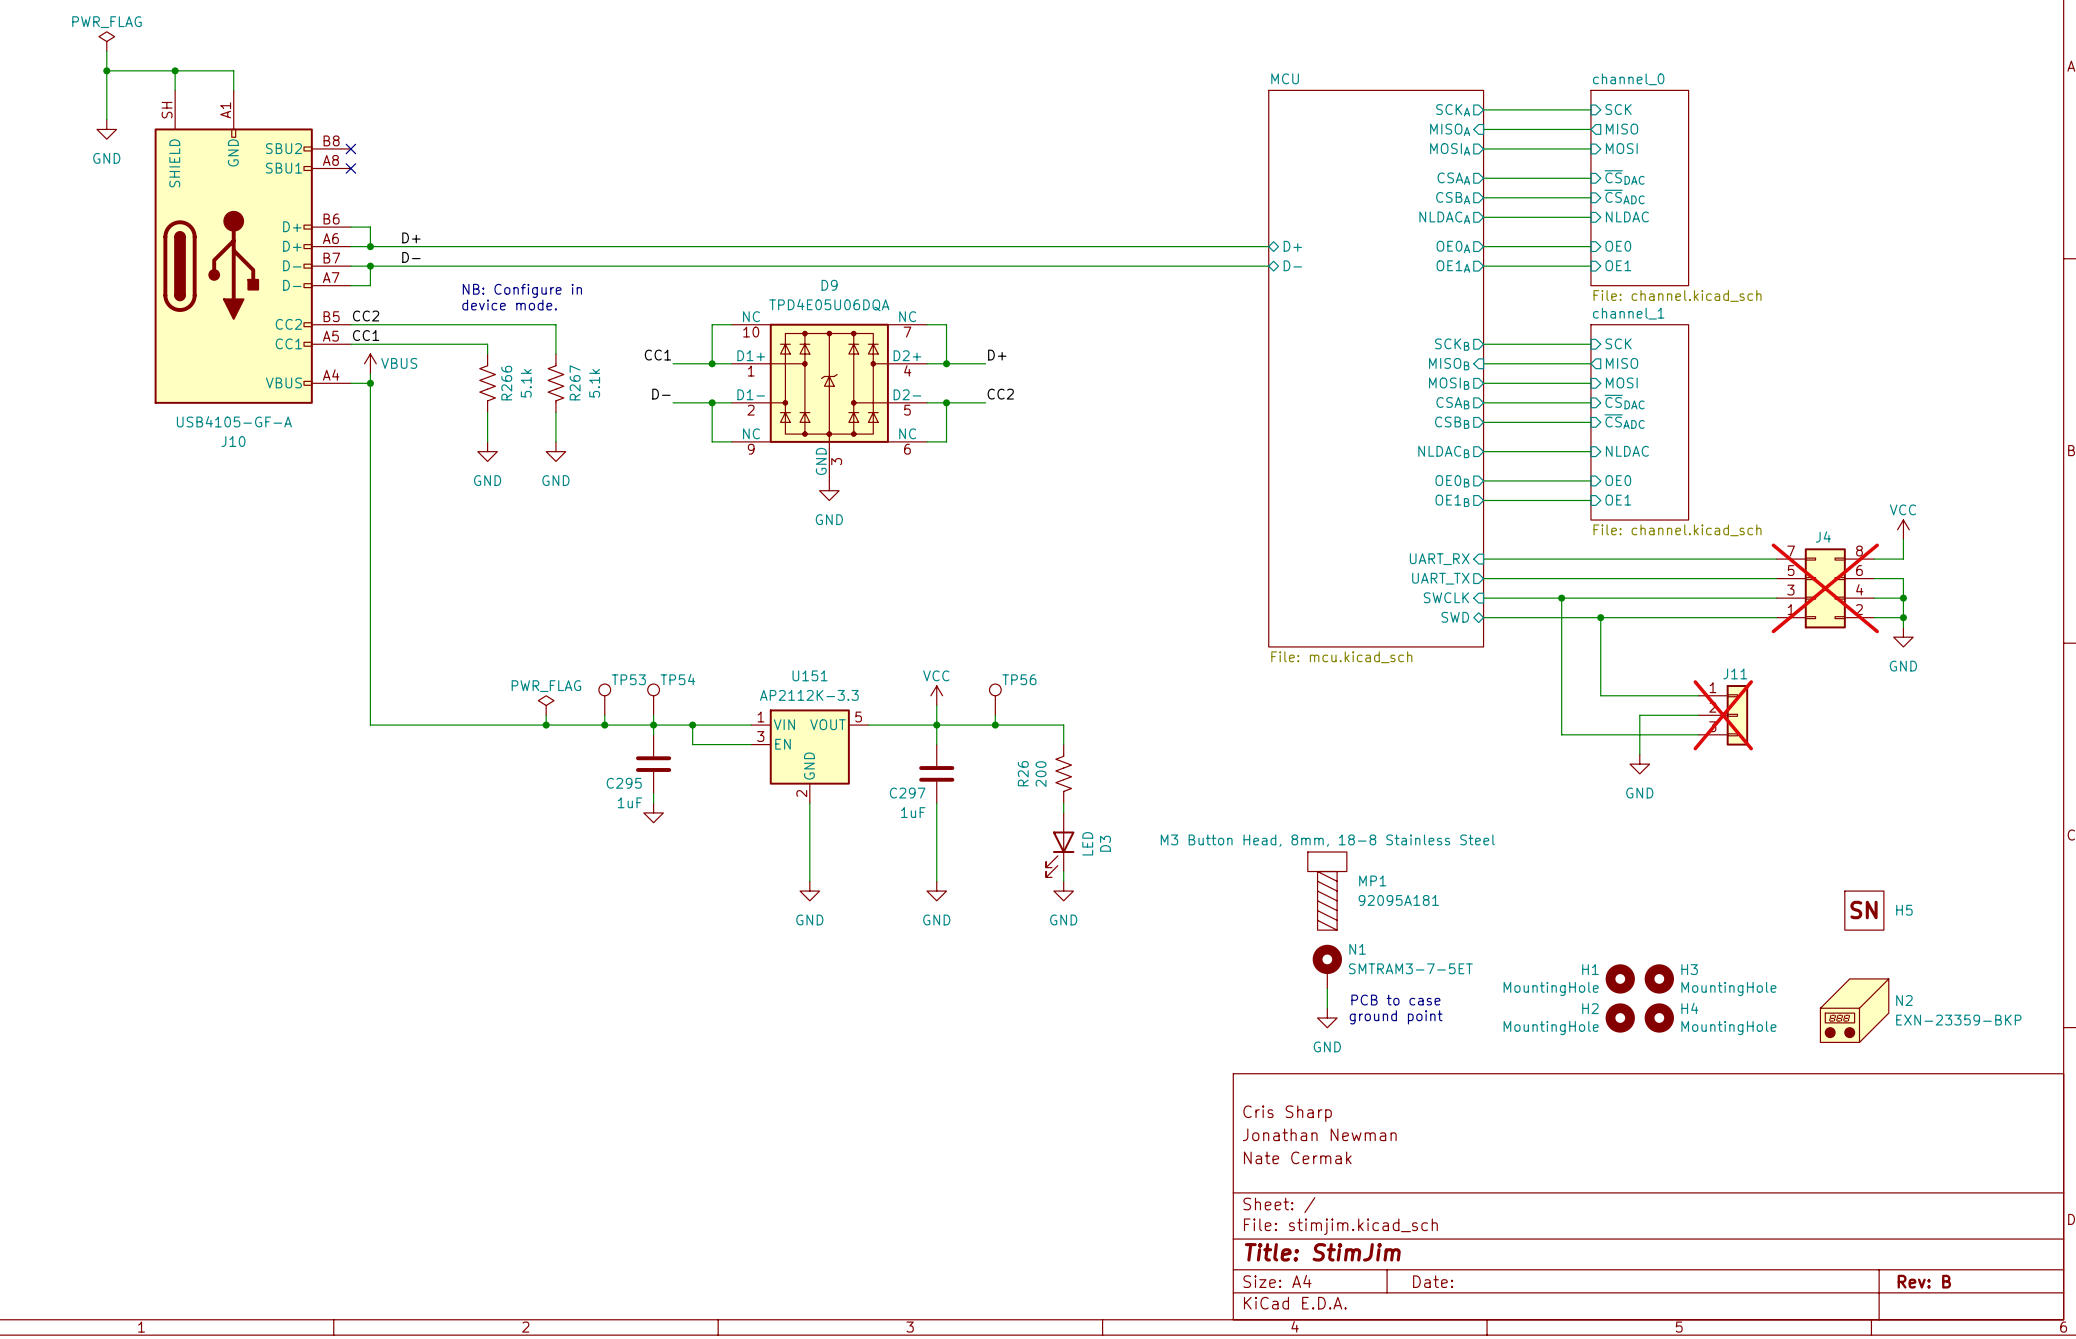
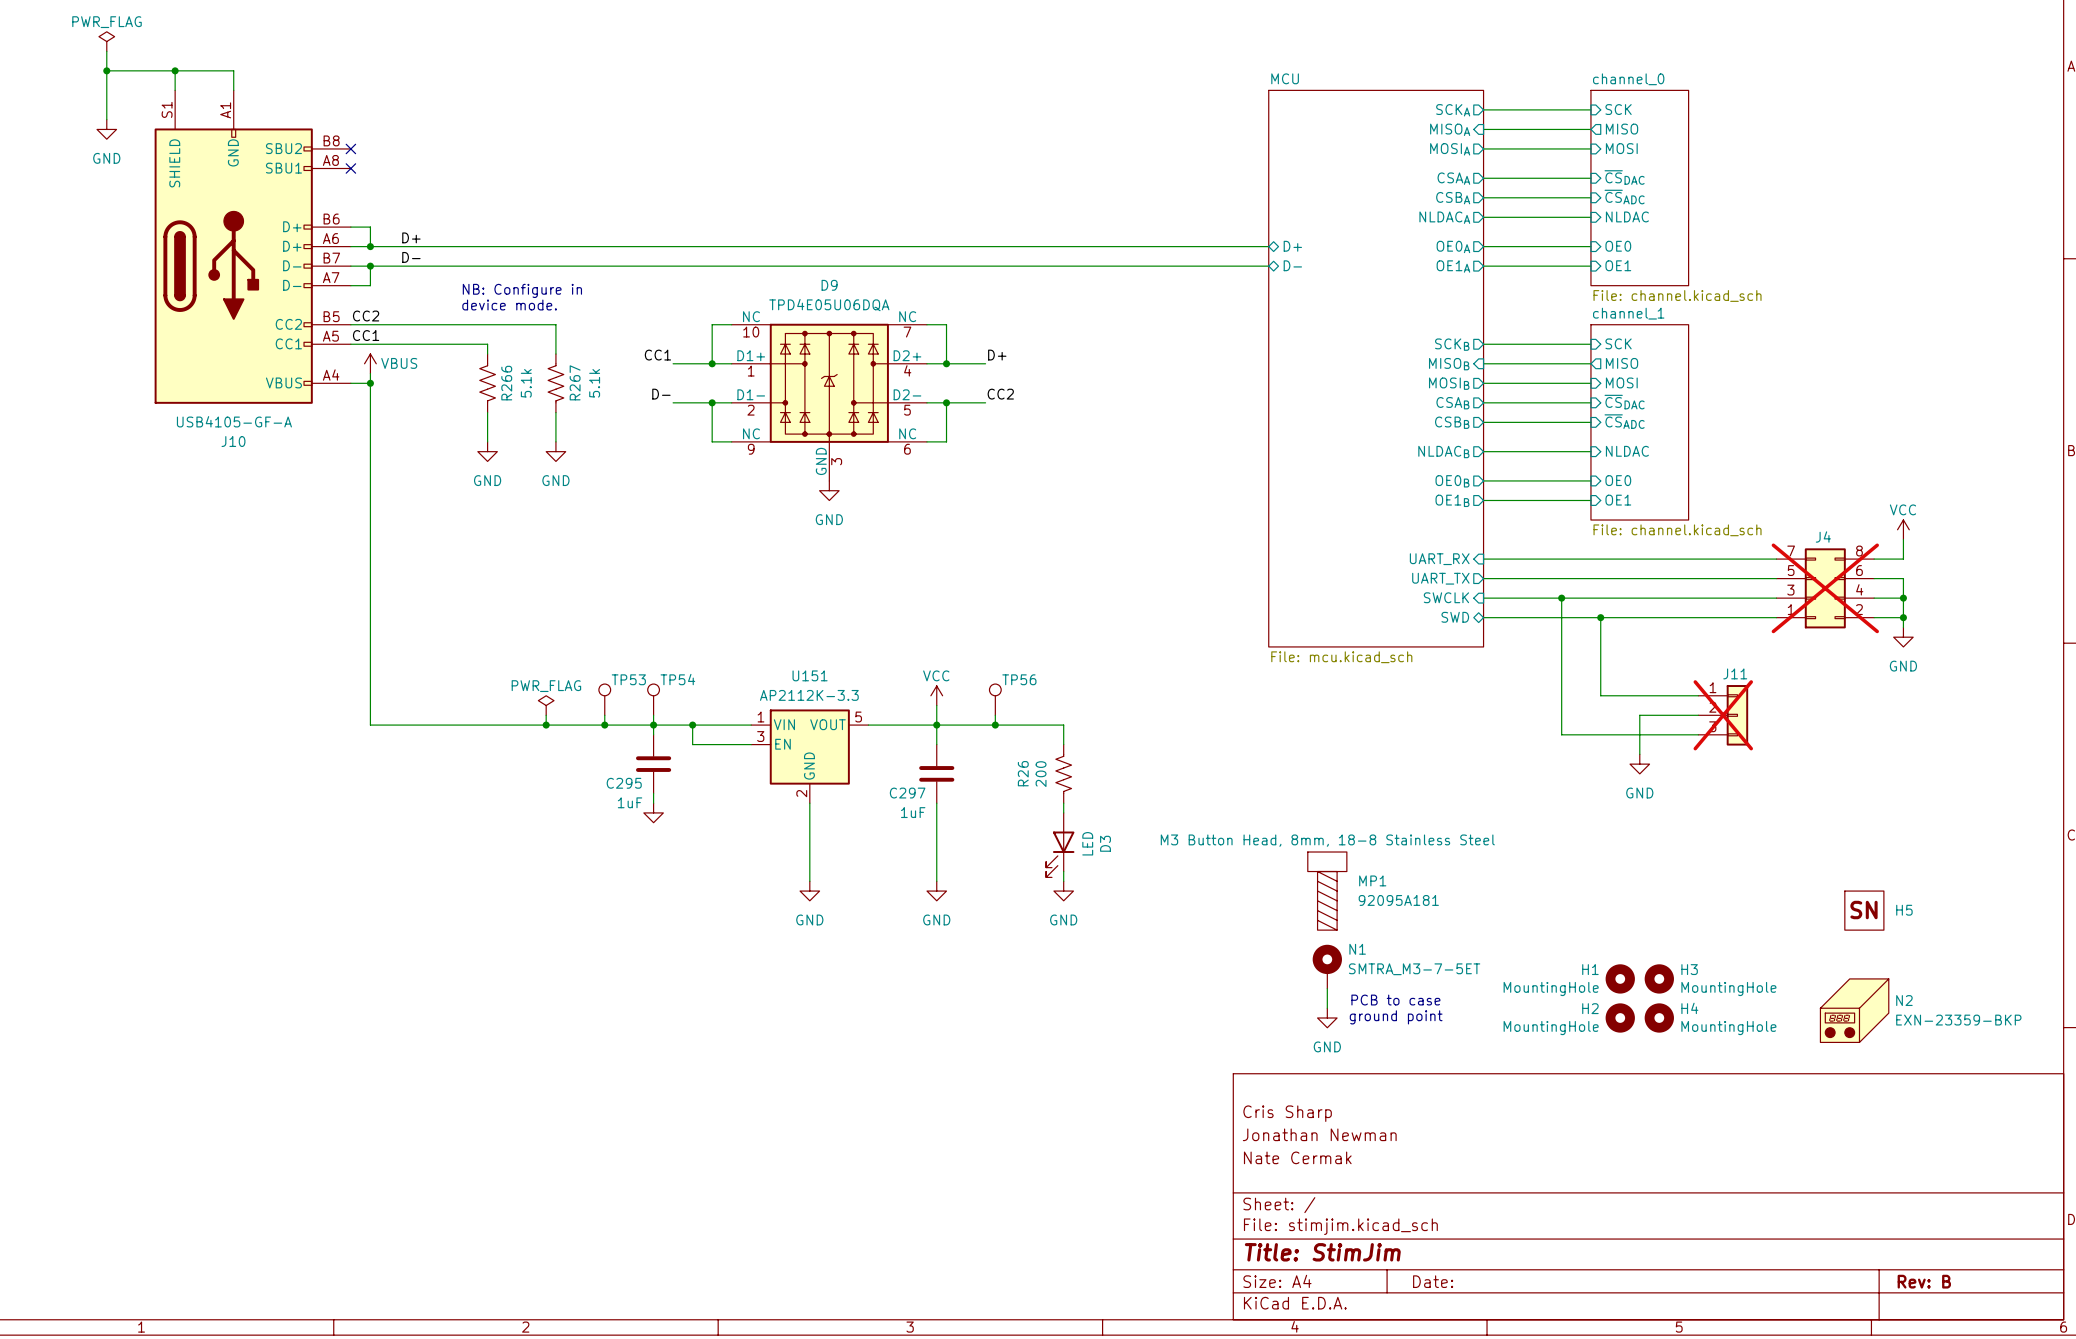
J10 pin number: SH (167, 110) -> S1 (167, 109)
N1 value: SMTRAM3-7-5ET (1410, 968) -> SMTRA_M3-7-5ET (1414, 969)

